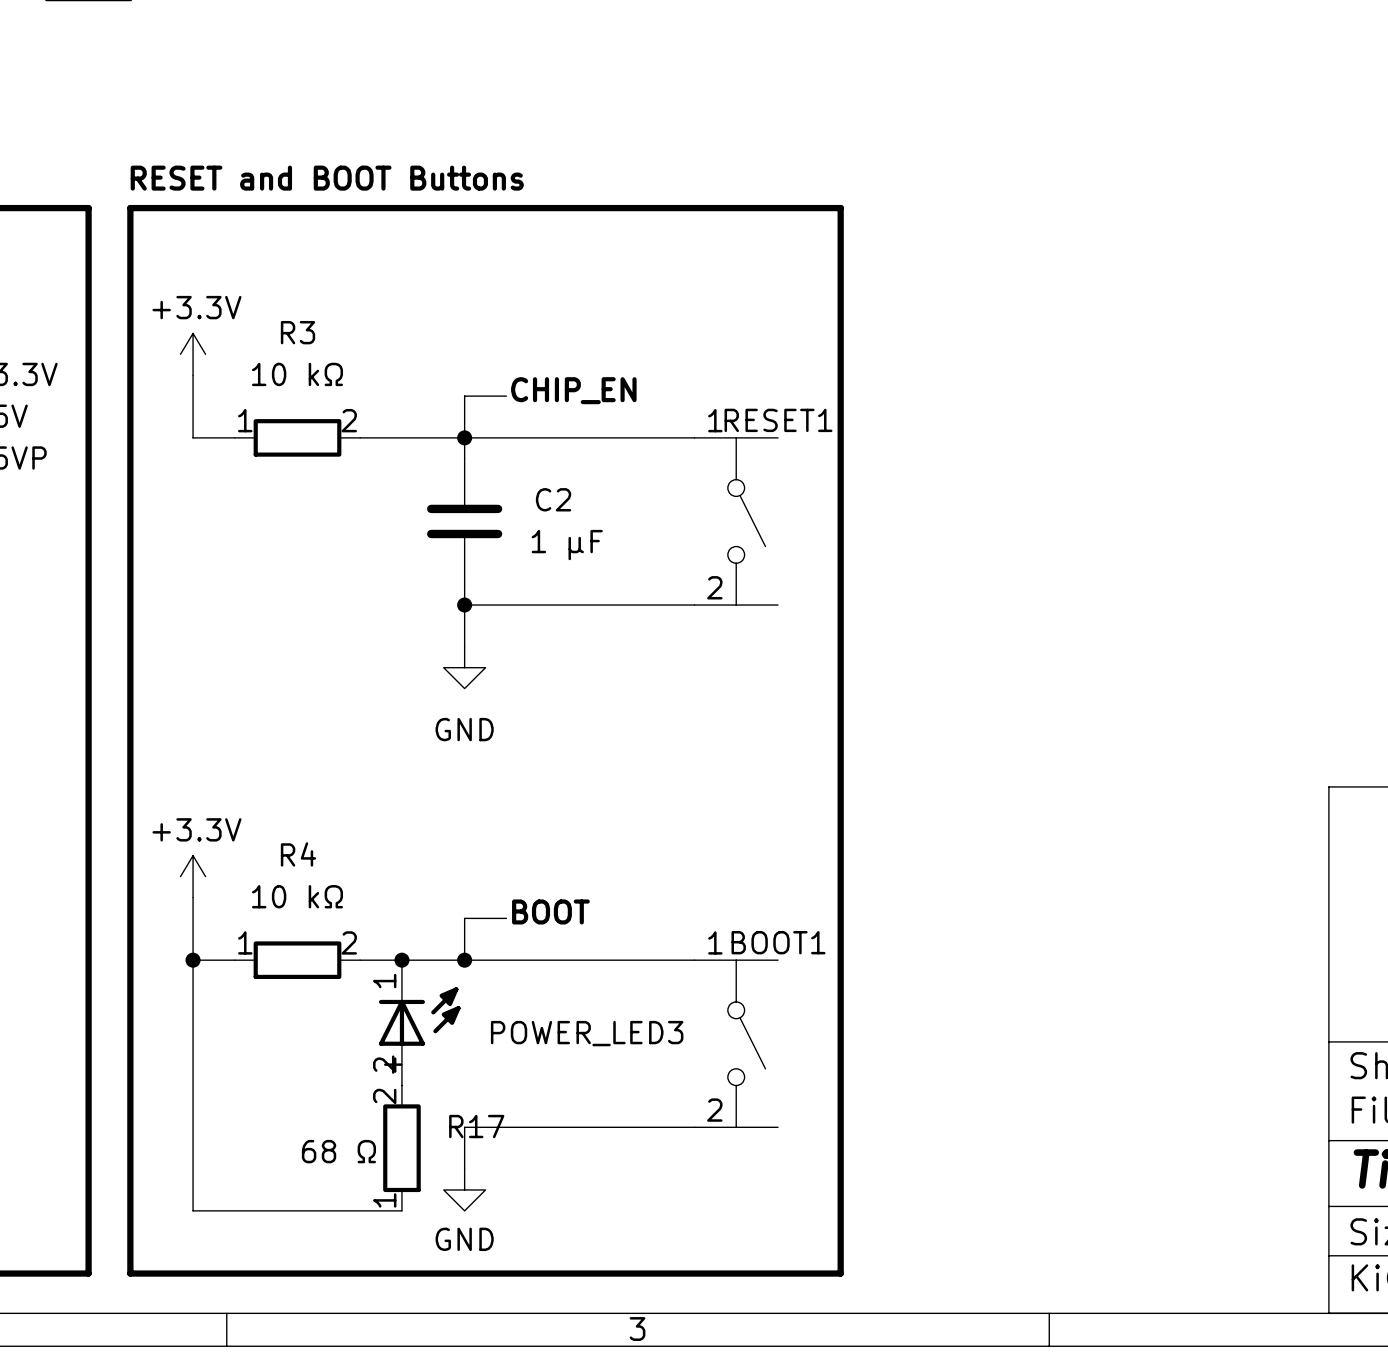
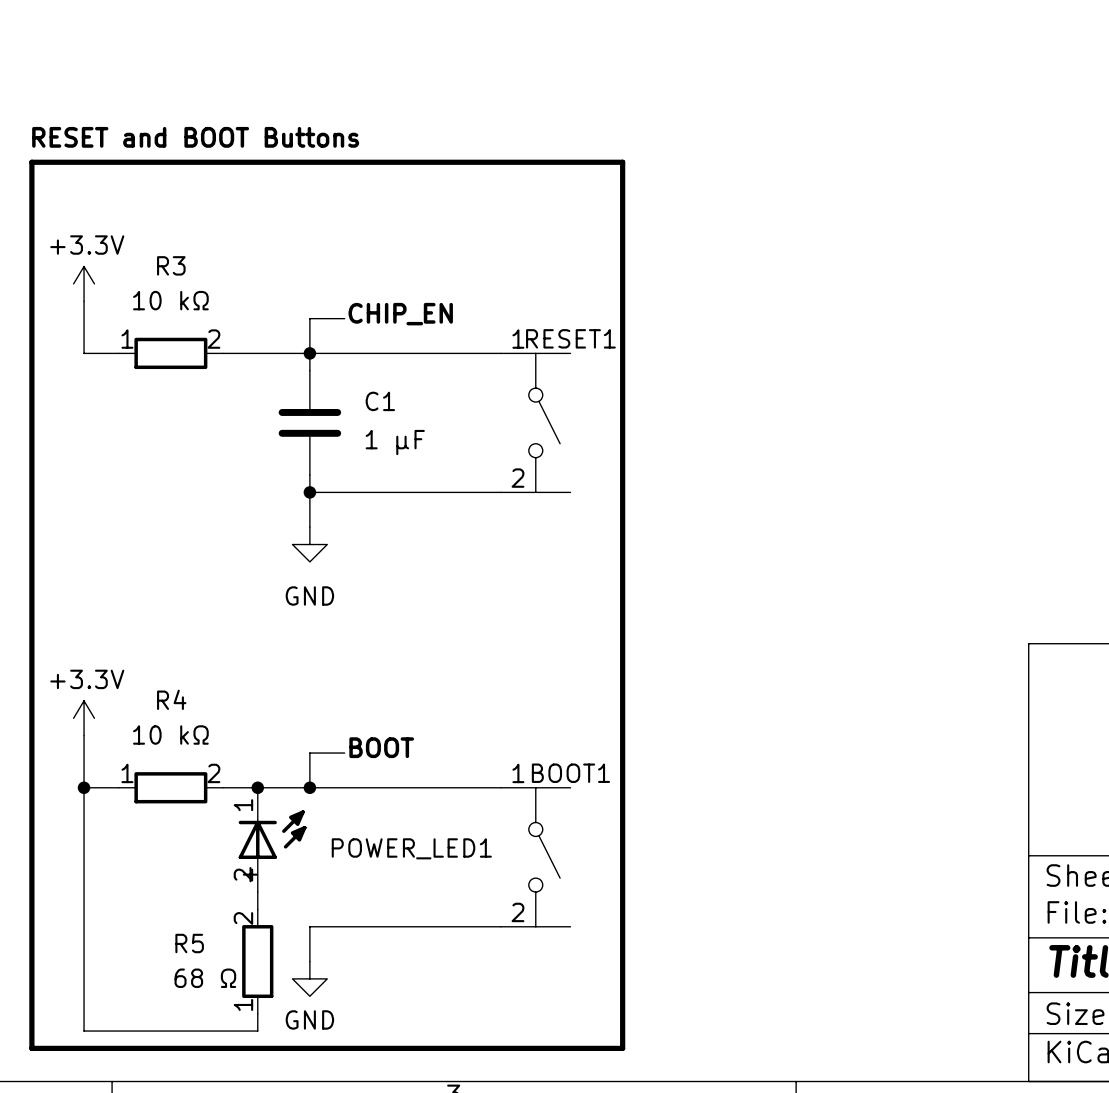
C2 name: C2 (553, 499) -> C1 (380, 401)
POWER_LED3 name: POWER_LED3 (587, 1033) -> POWER_LED1 (411, 848)
R17: (401, 1148) -> none
R5: none -> (257, 961)
wire: (193, 1210) (401, 1210) -> (84, 996) (84, 1031) (257, 1031) (257, 1013)

